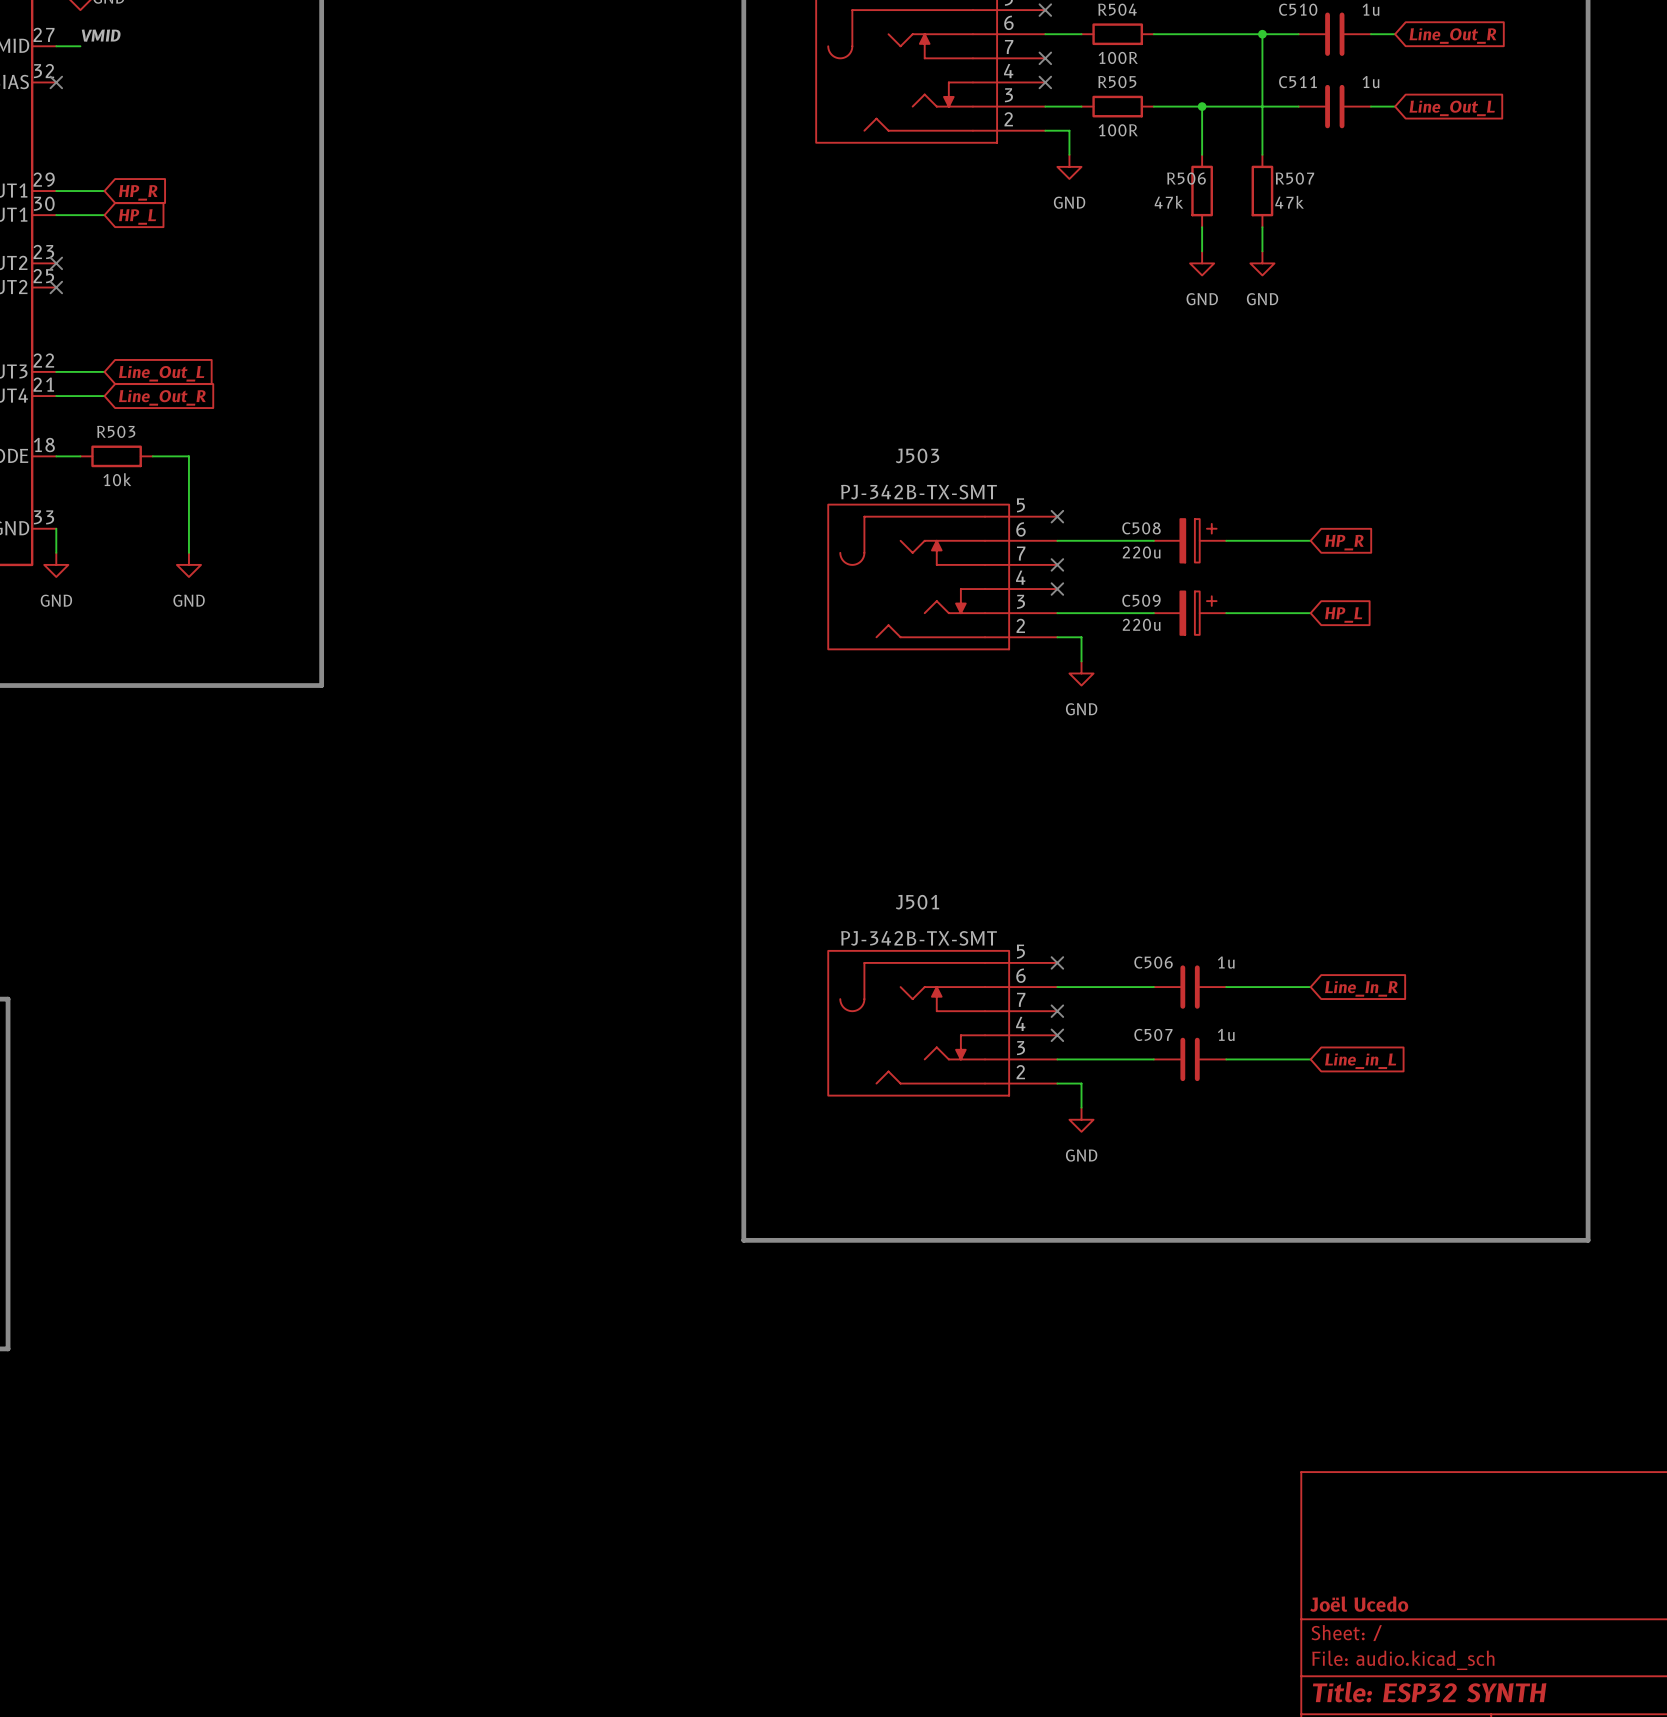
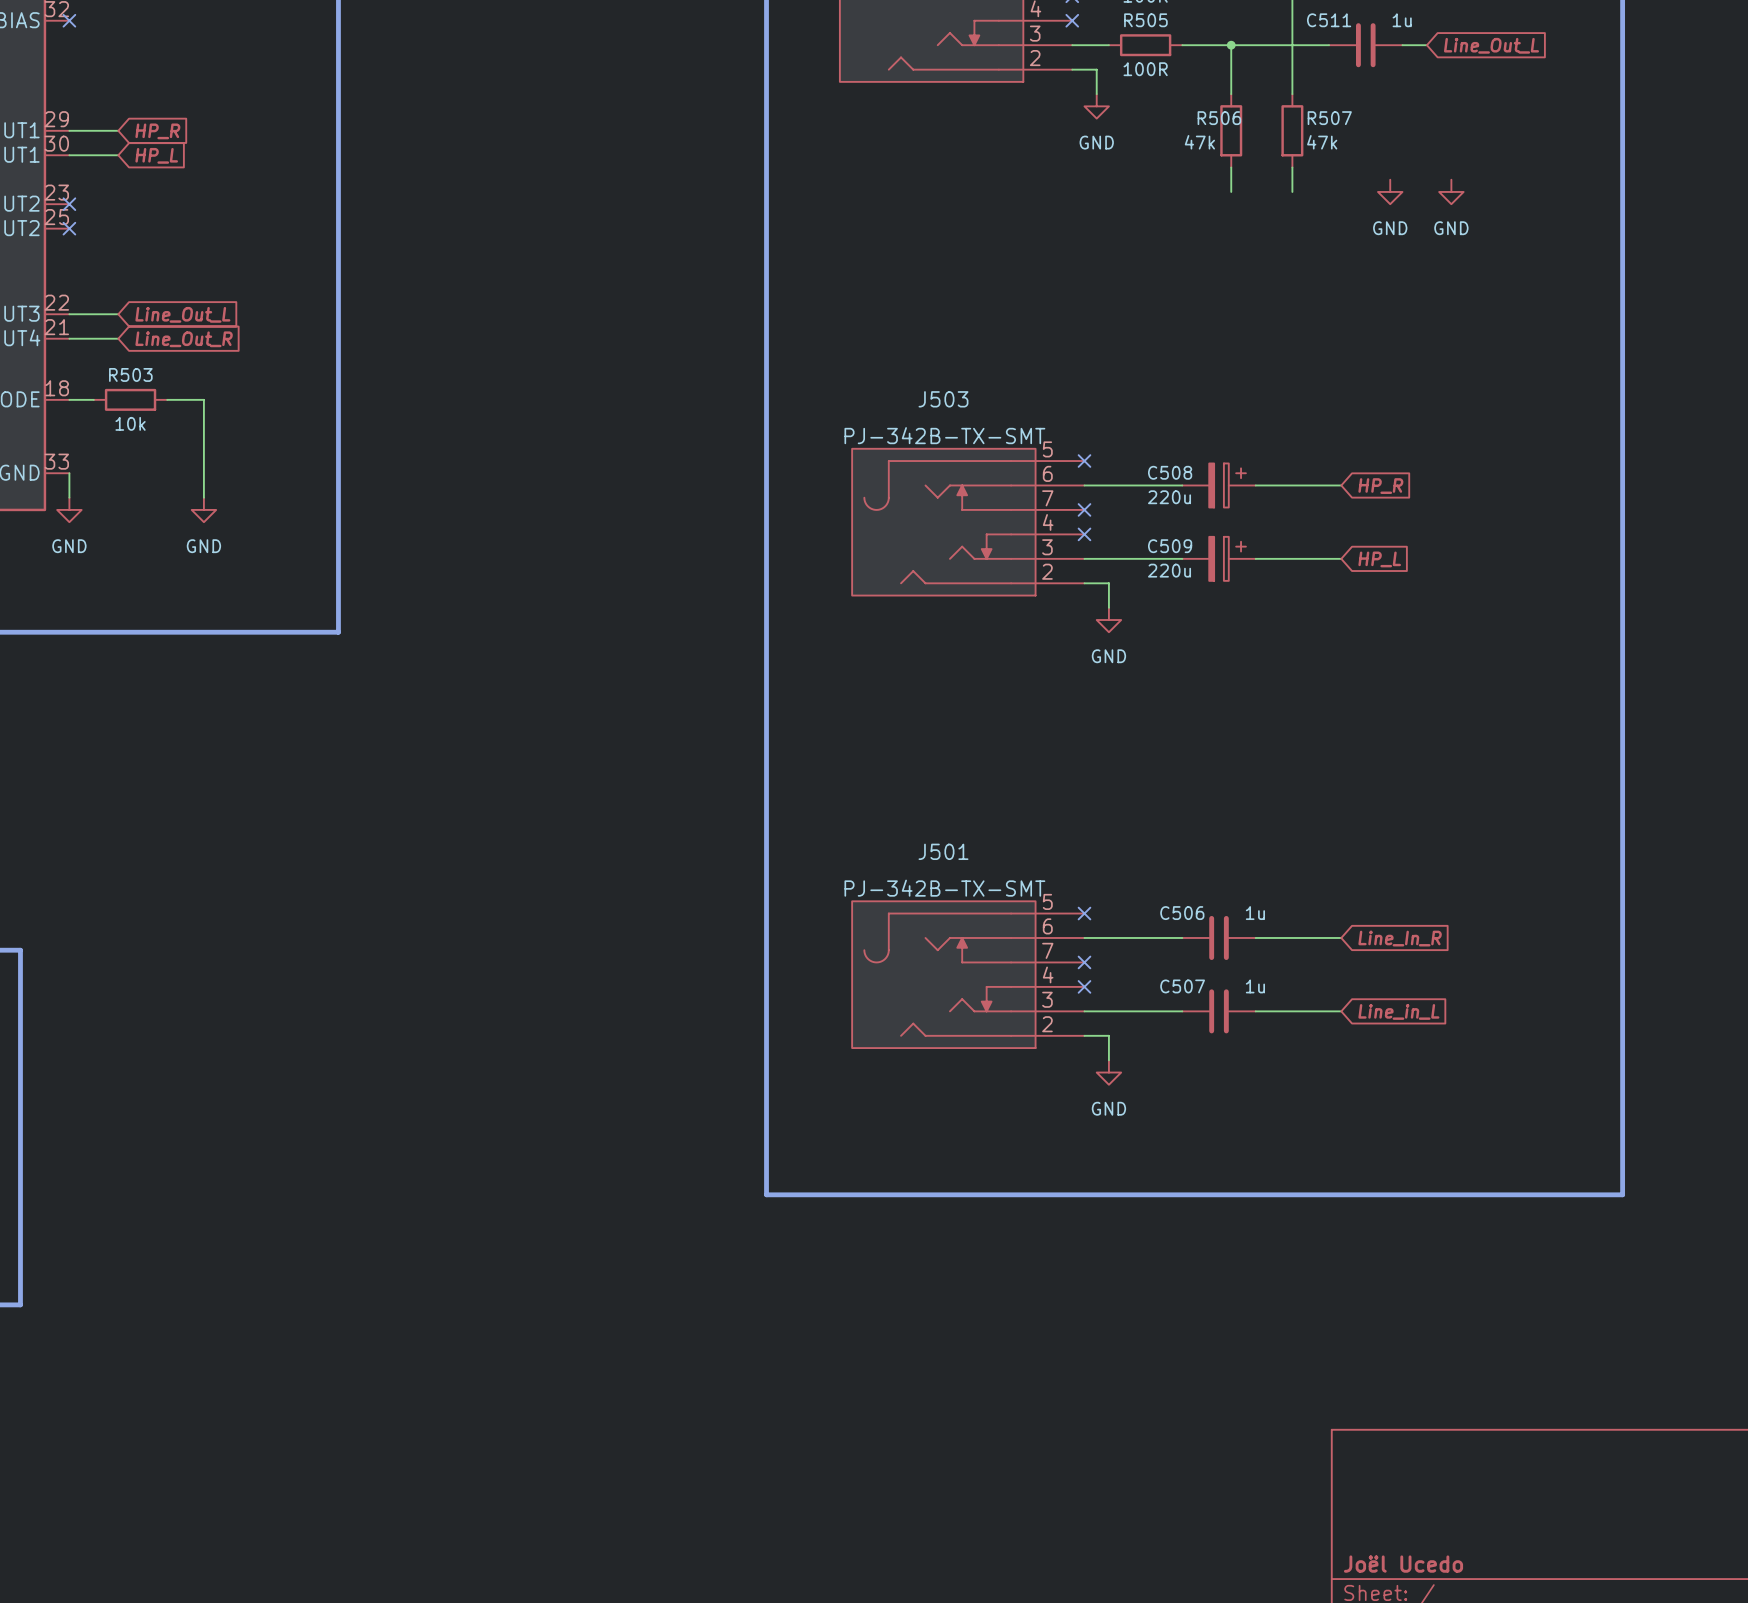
power symbol: none -> GND (1390, 191)
power symbol: none -> GND (1451, 191)
power symbol: GND (1202, 263) -> none
power symbol: GND (1262, 263) -> none

